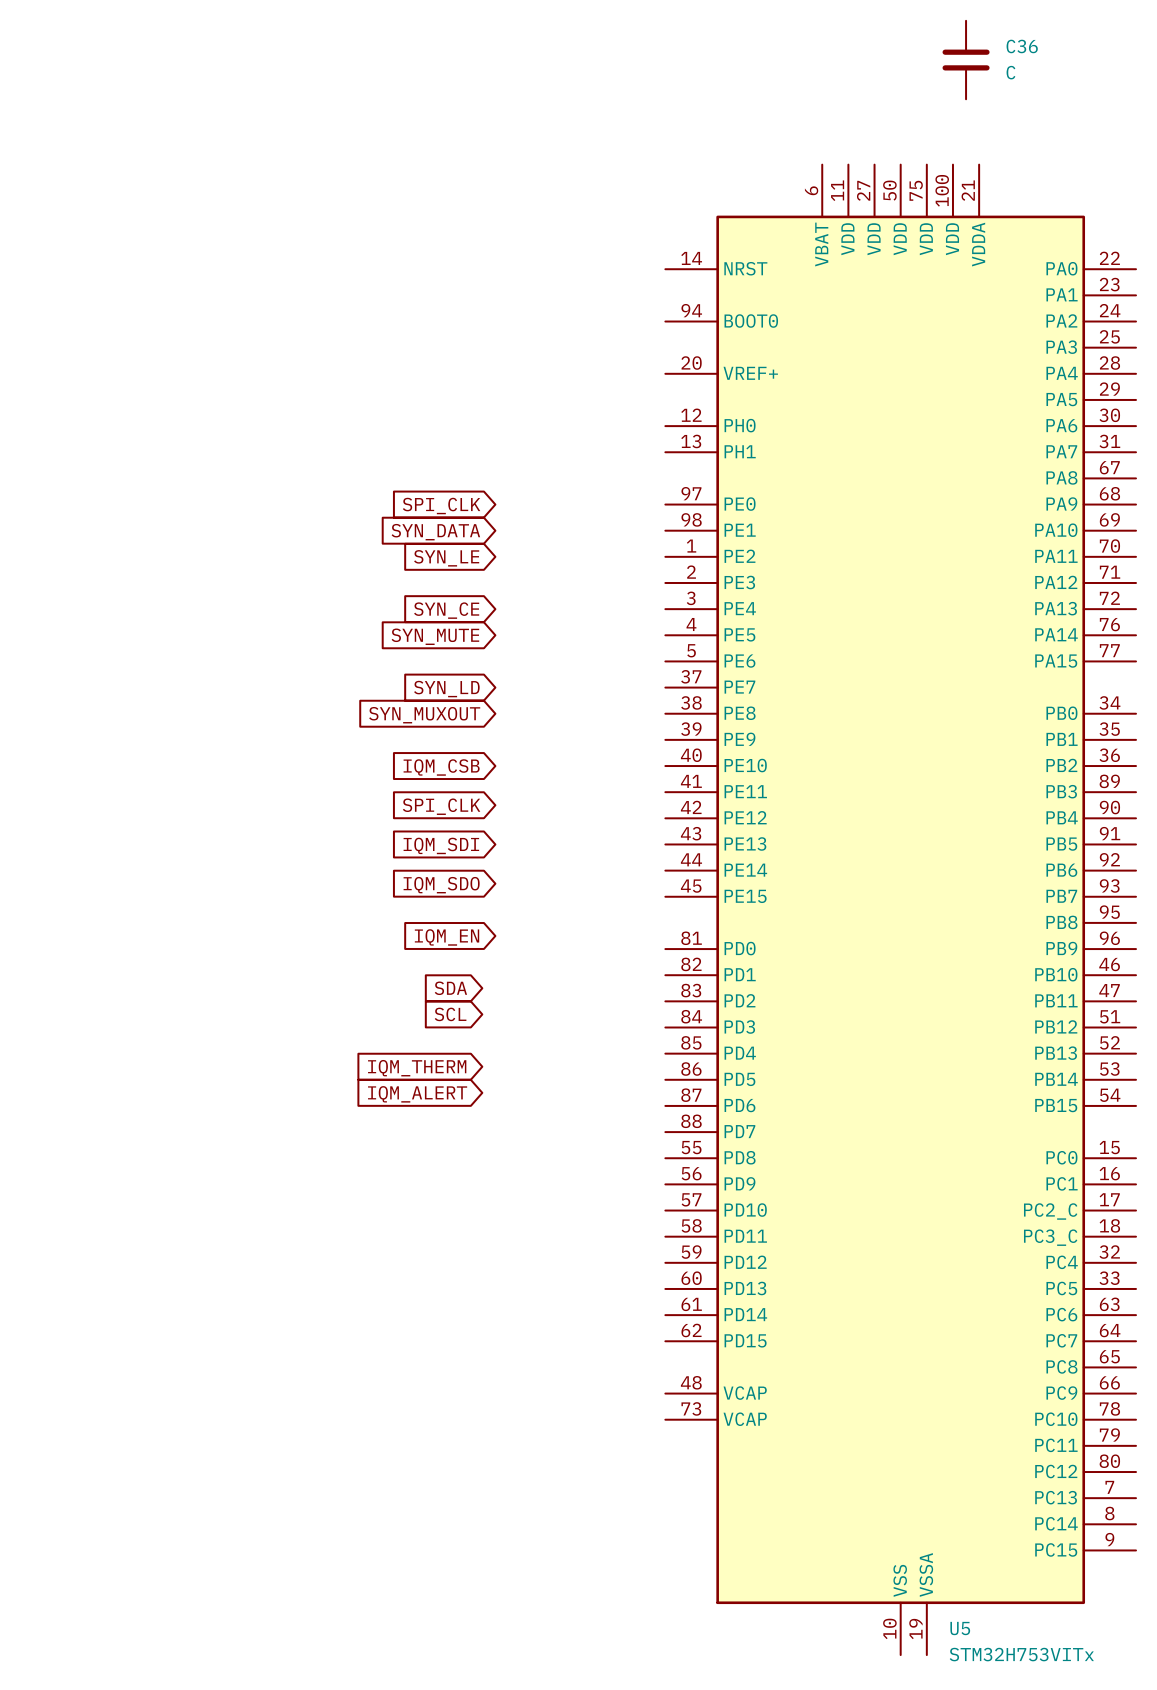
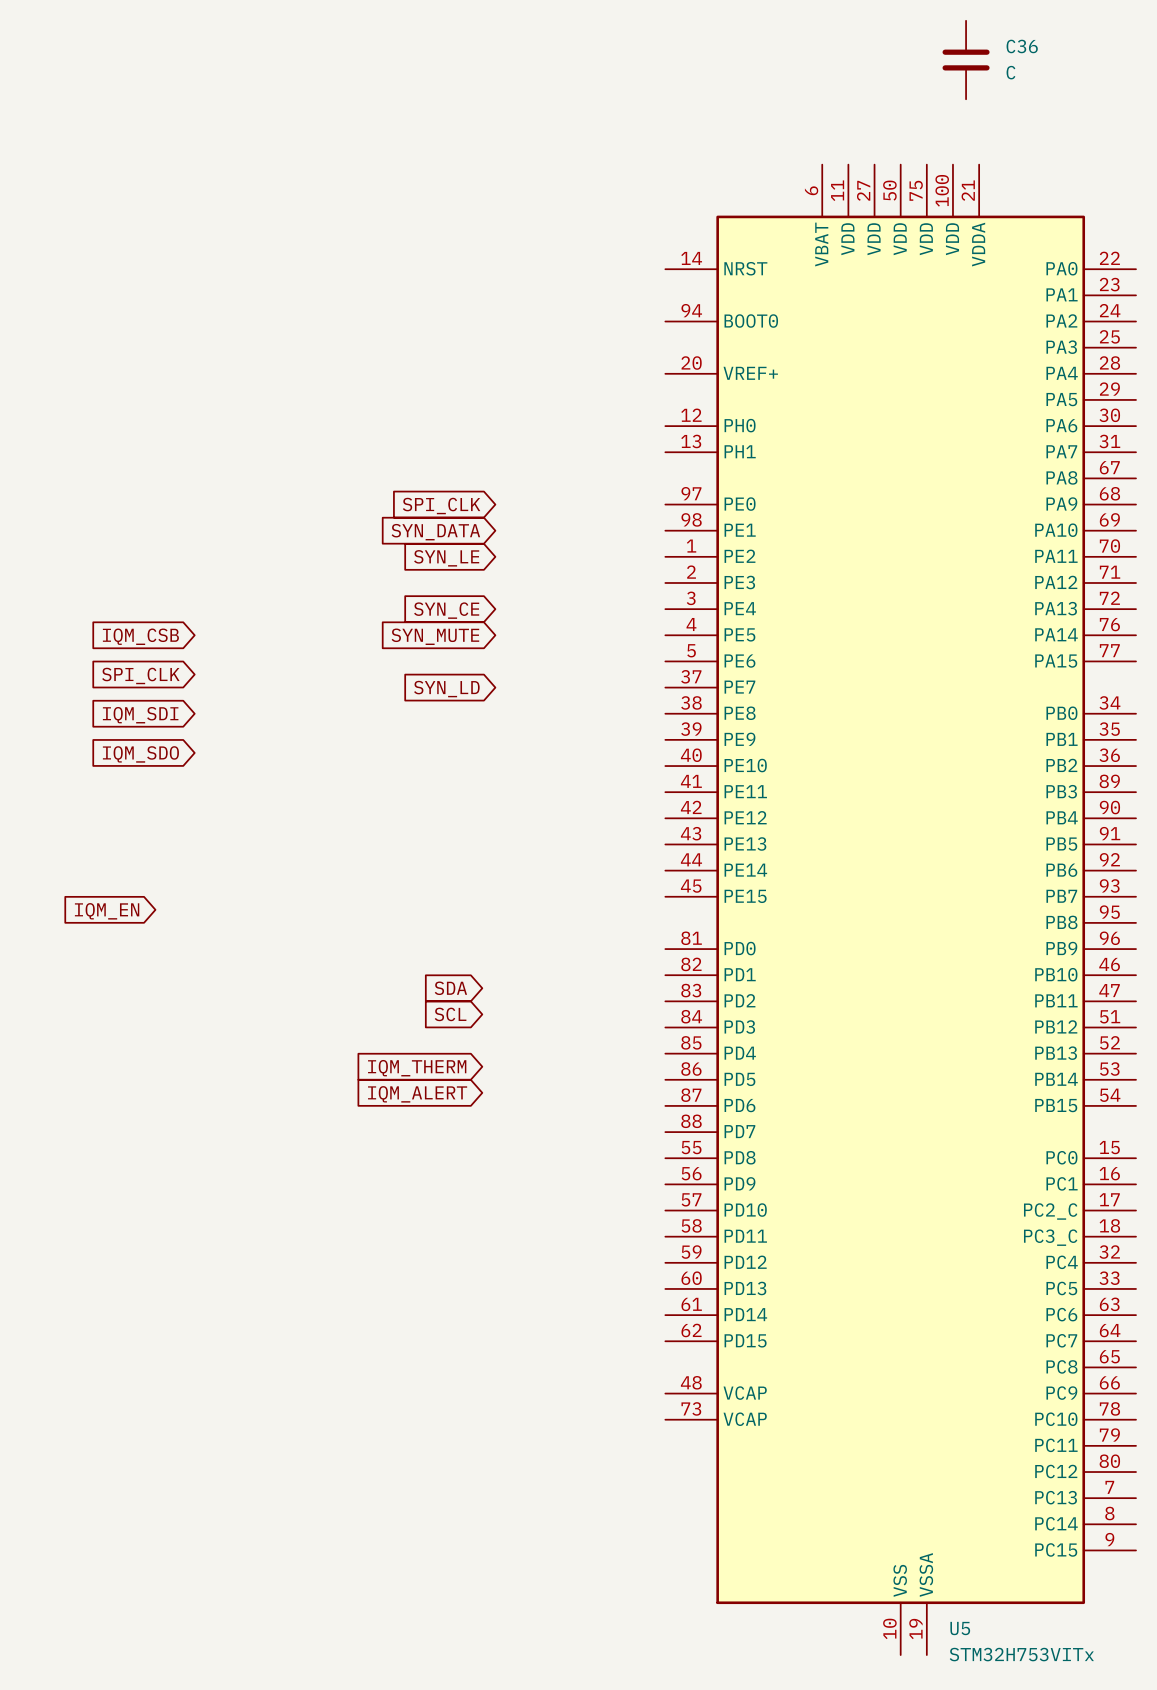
global label: none -> IQM_CSB (140, 636)
global label: none -> SPI_CLK (140, 675)
global label: none -> IQM_SDI (140, 715)
global label: SYN_MUXOUT (424, 715) -> none
global label: none -> IQM_SDO (140, 754)
global label: IQM_CSB (441, 767) -> none
global label: SPI_CLK (441, 806) -> none
global label: IQM_SDI (441, 845) -> none
global label: IQM_SDO (441, 885) -> none
global label: none -> IQM_EN (107, 911)
global label: IQM_EN (447, 937) -> none

